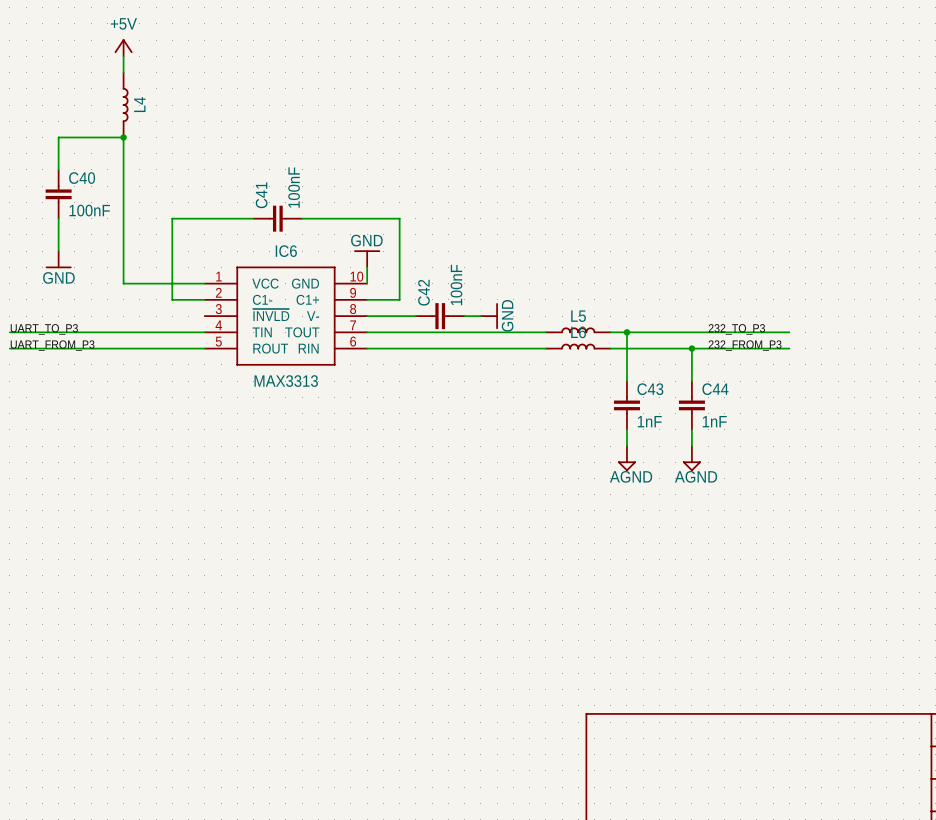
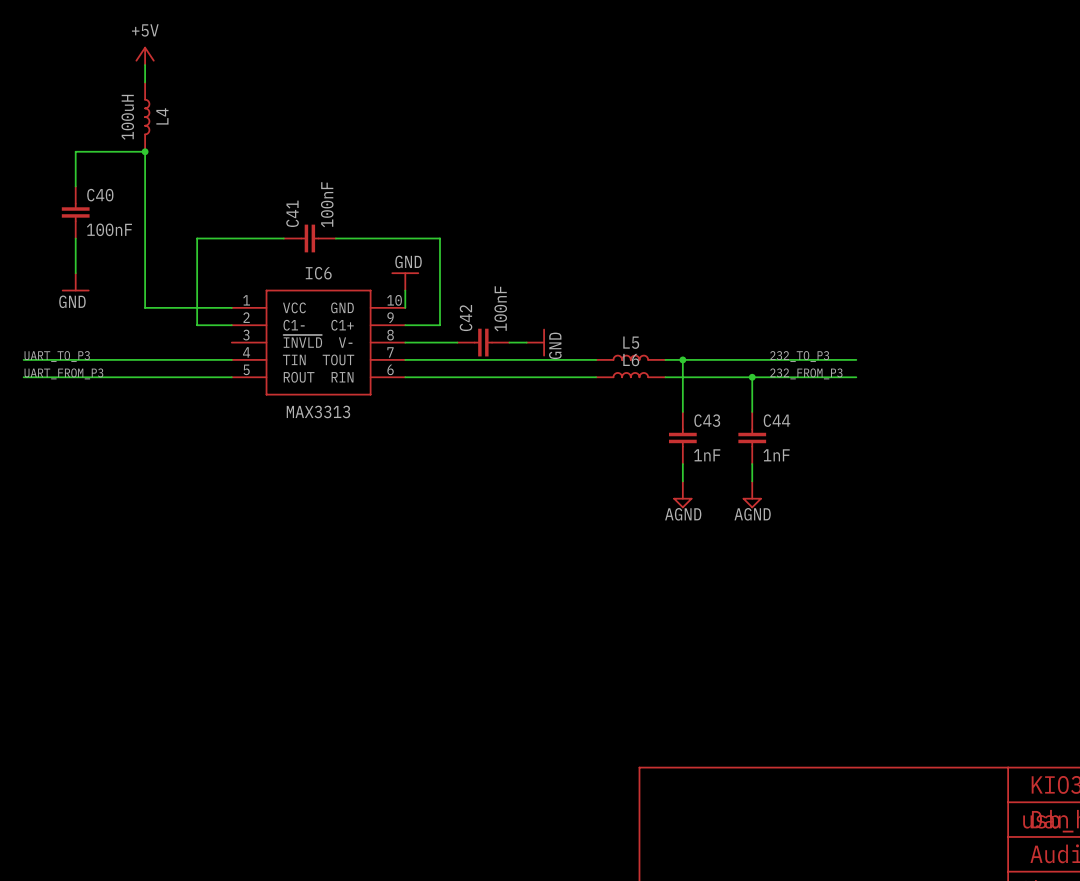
L4 value: none -> 100uH (127, 117)

